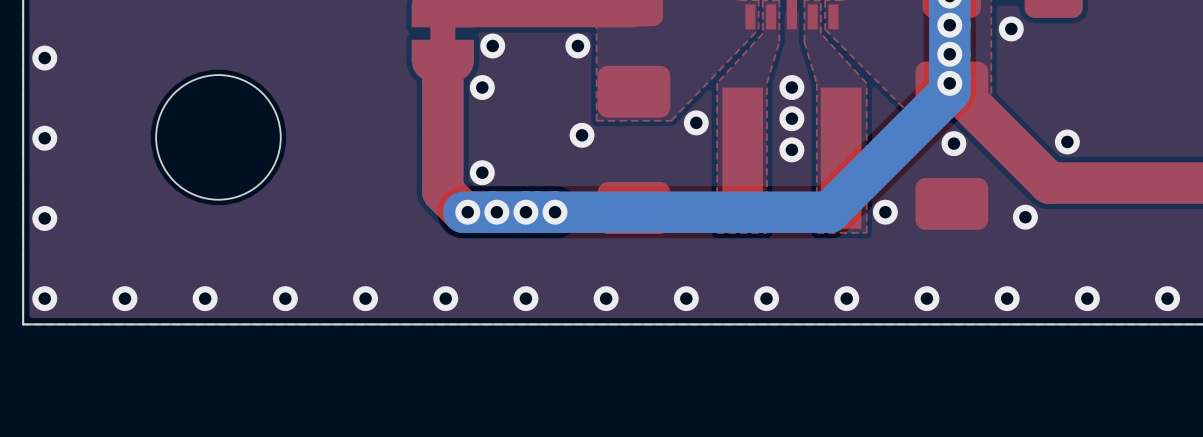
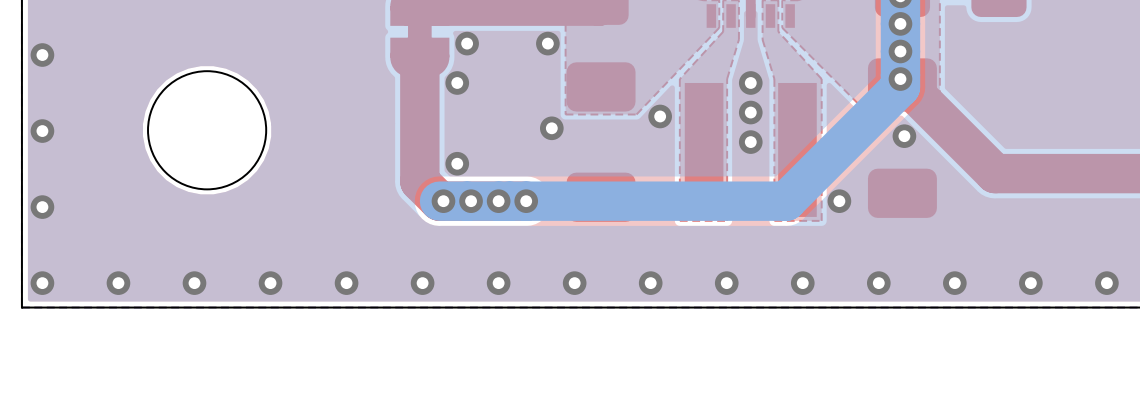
via: (1011, 28) -> none
via: (1067, 141) -> none
via: (1025, 217) -> none

